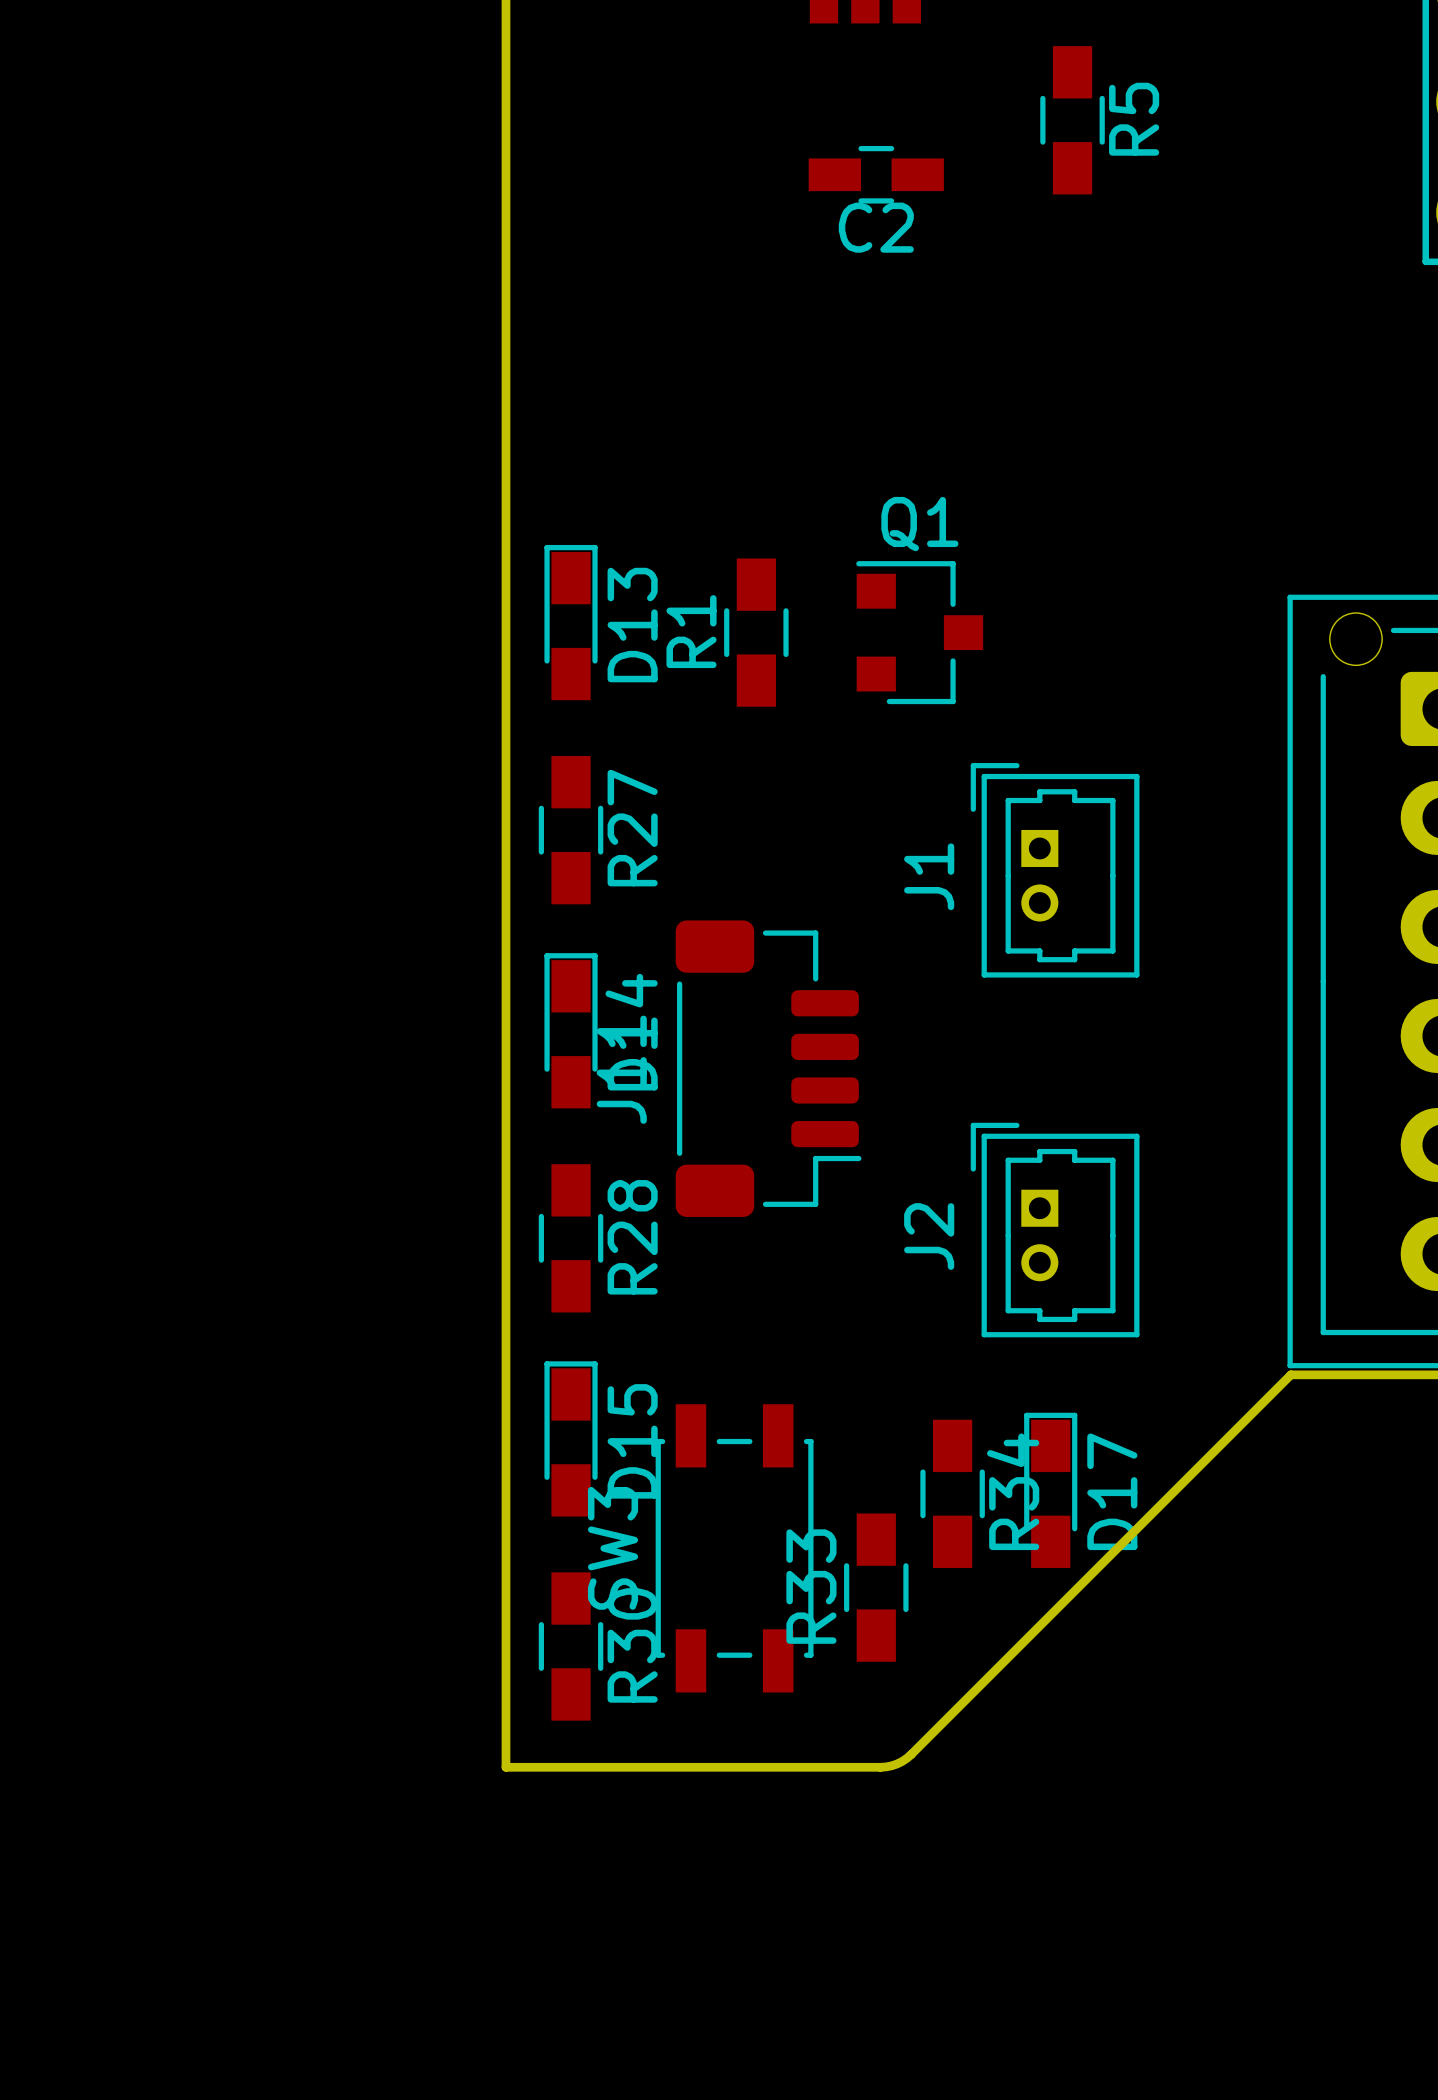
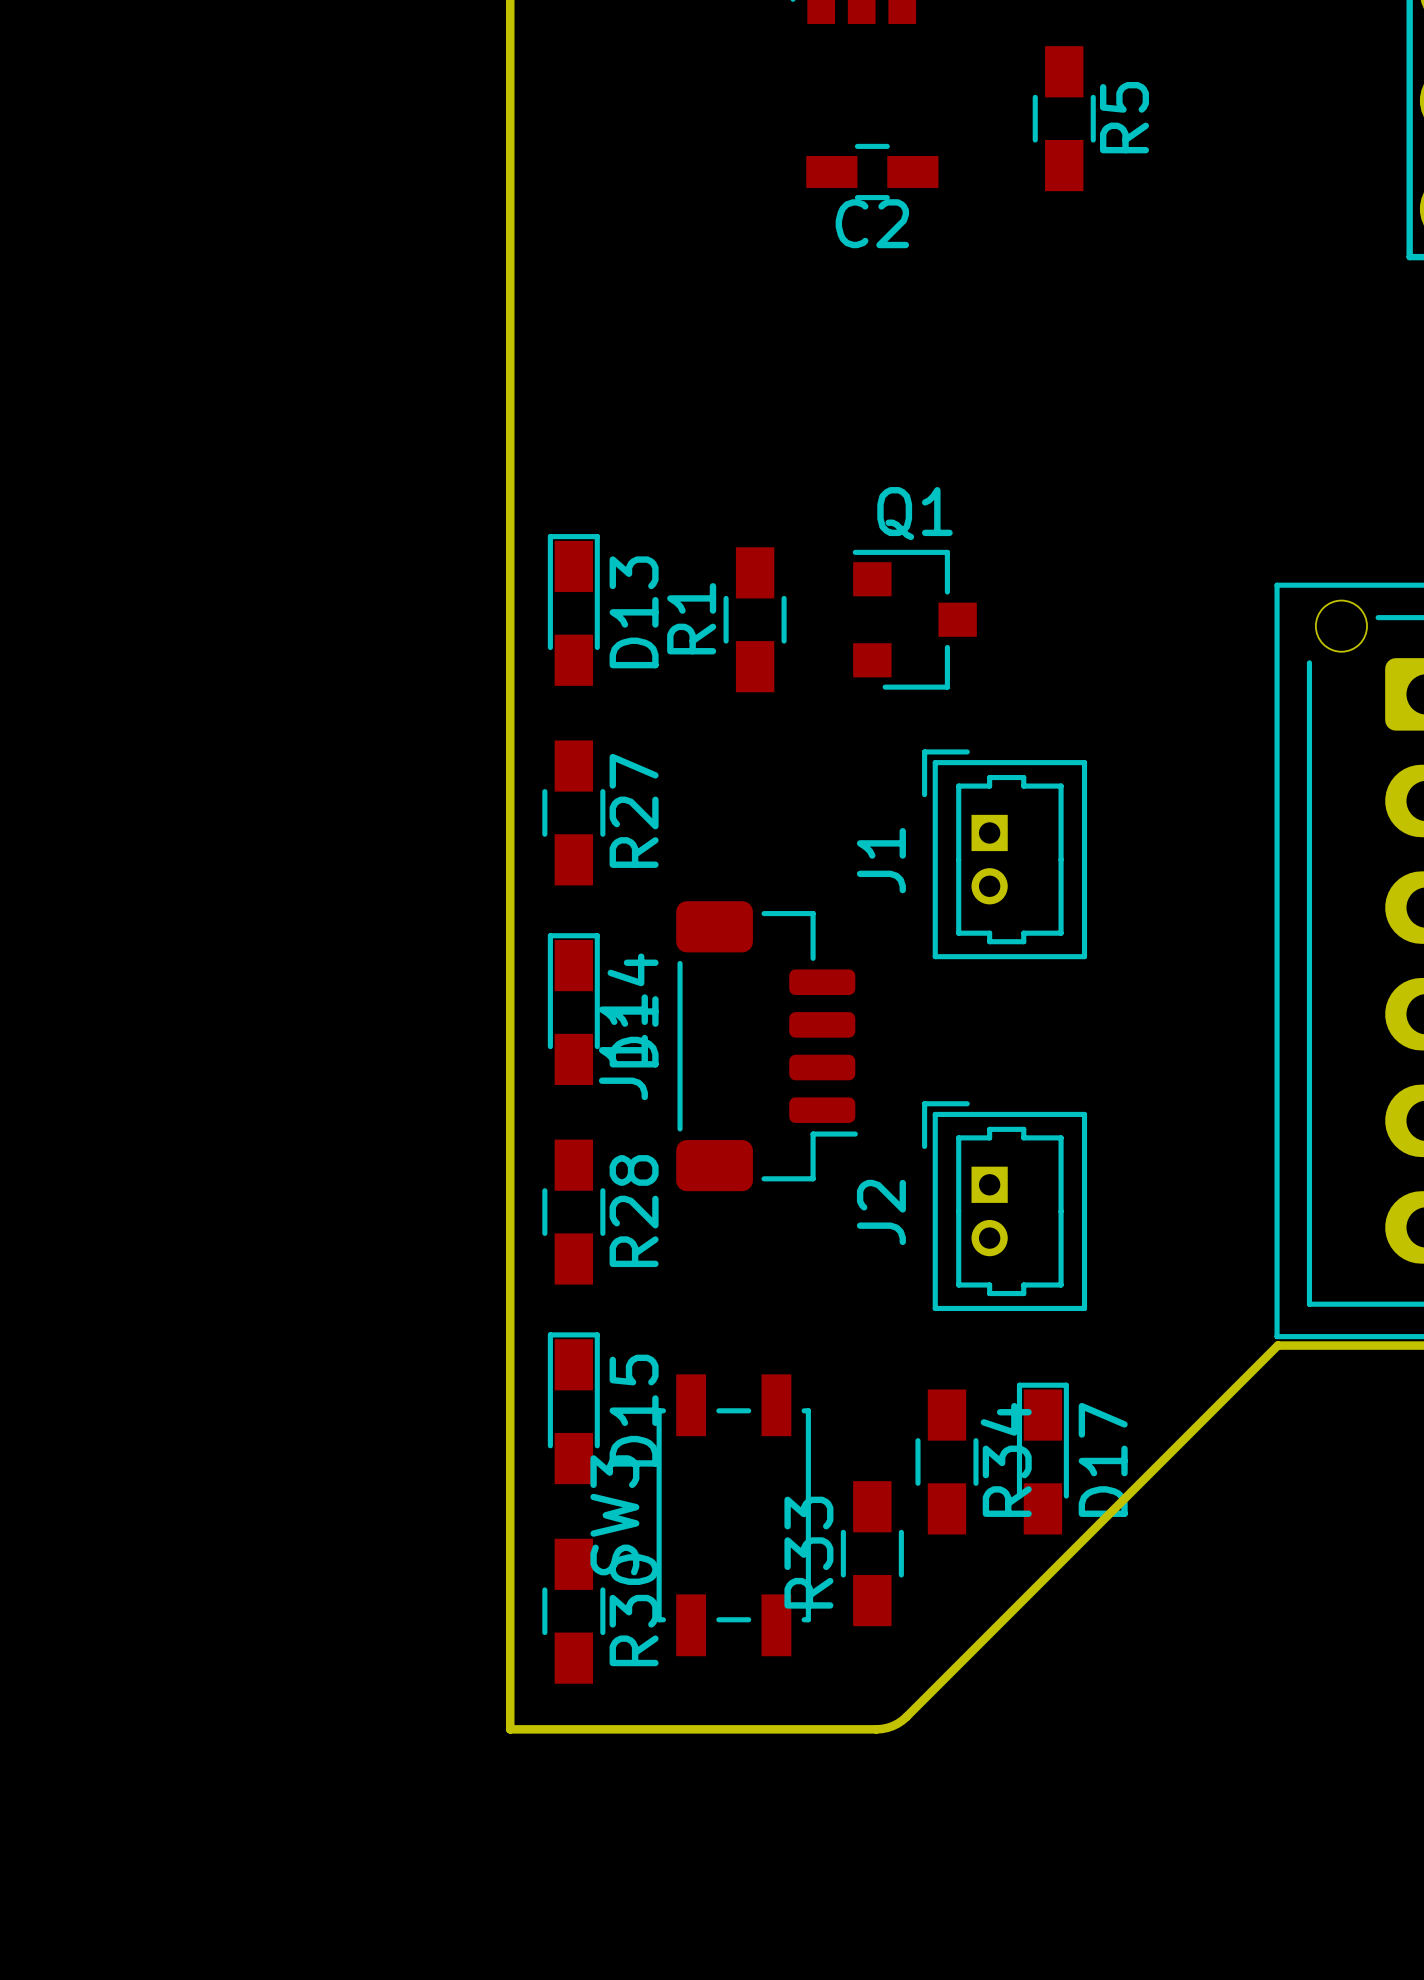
J1 position: (1055, 870) -> (1004, 854)
J2 position: (1055, 1230) -> (1004, 1206)

